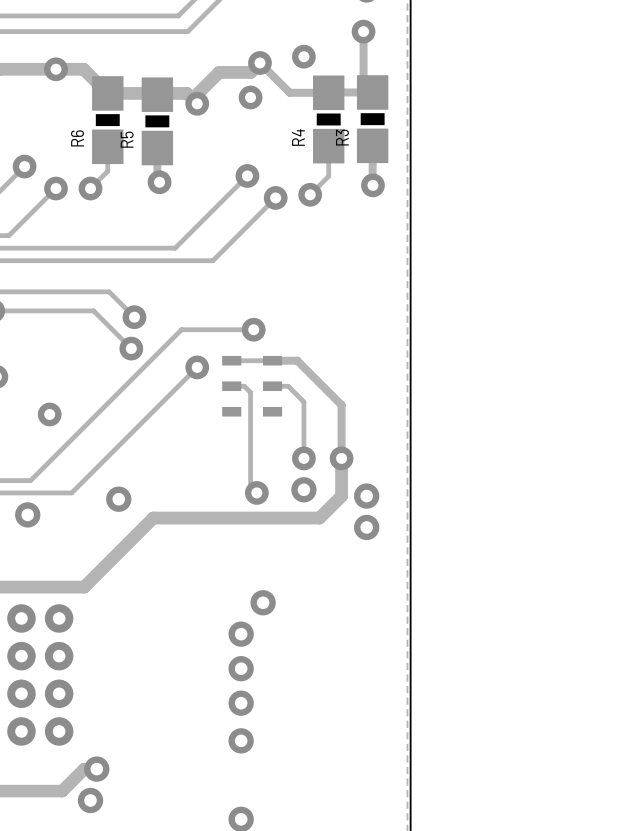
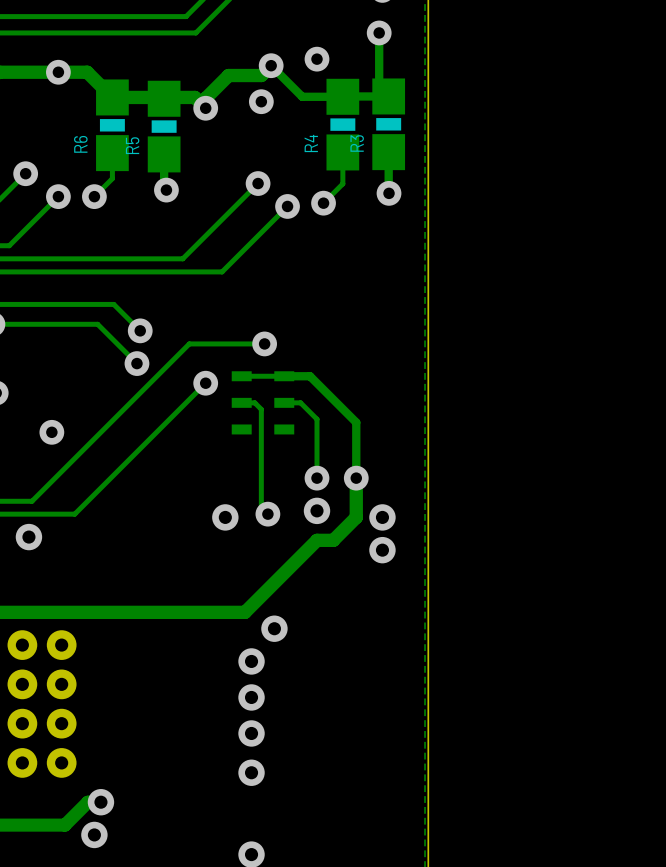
via position: (118, 499) -> (225, 517)
track: (303, 518) (153, 518) (84, 587) -> (317, 540) (244, 612) (87, 612)

